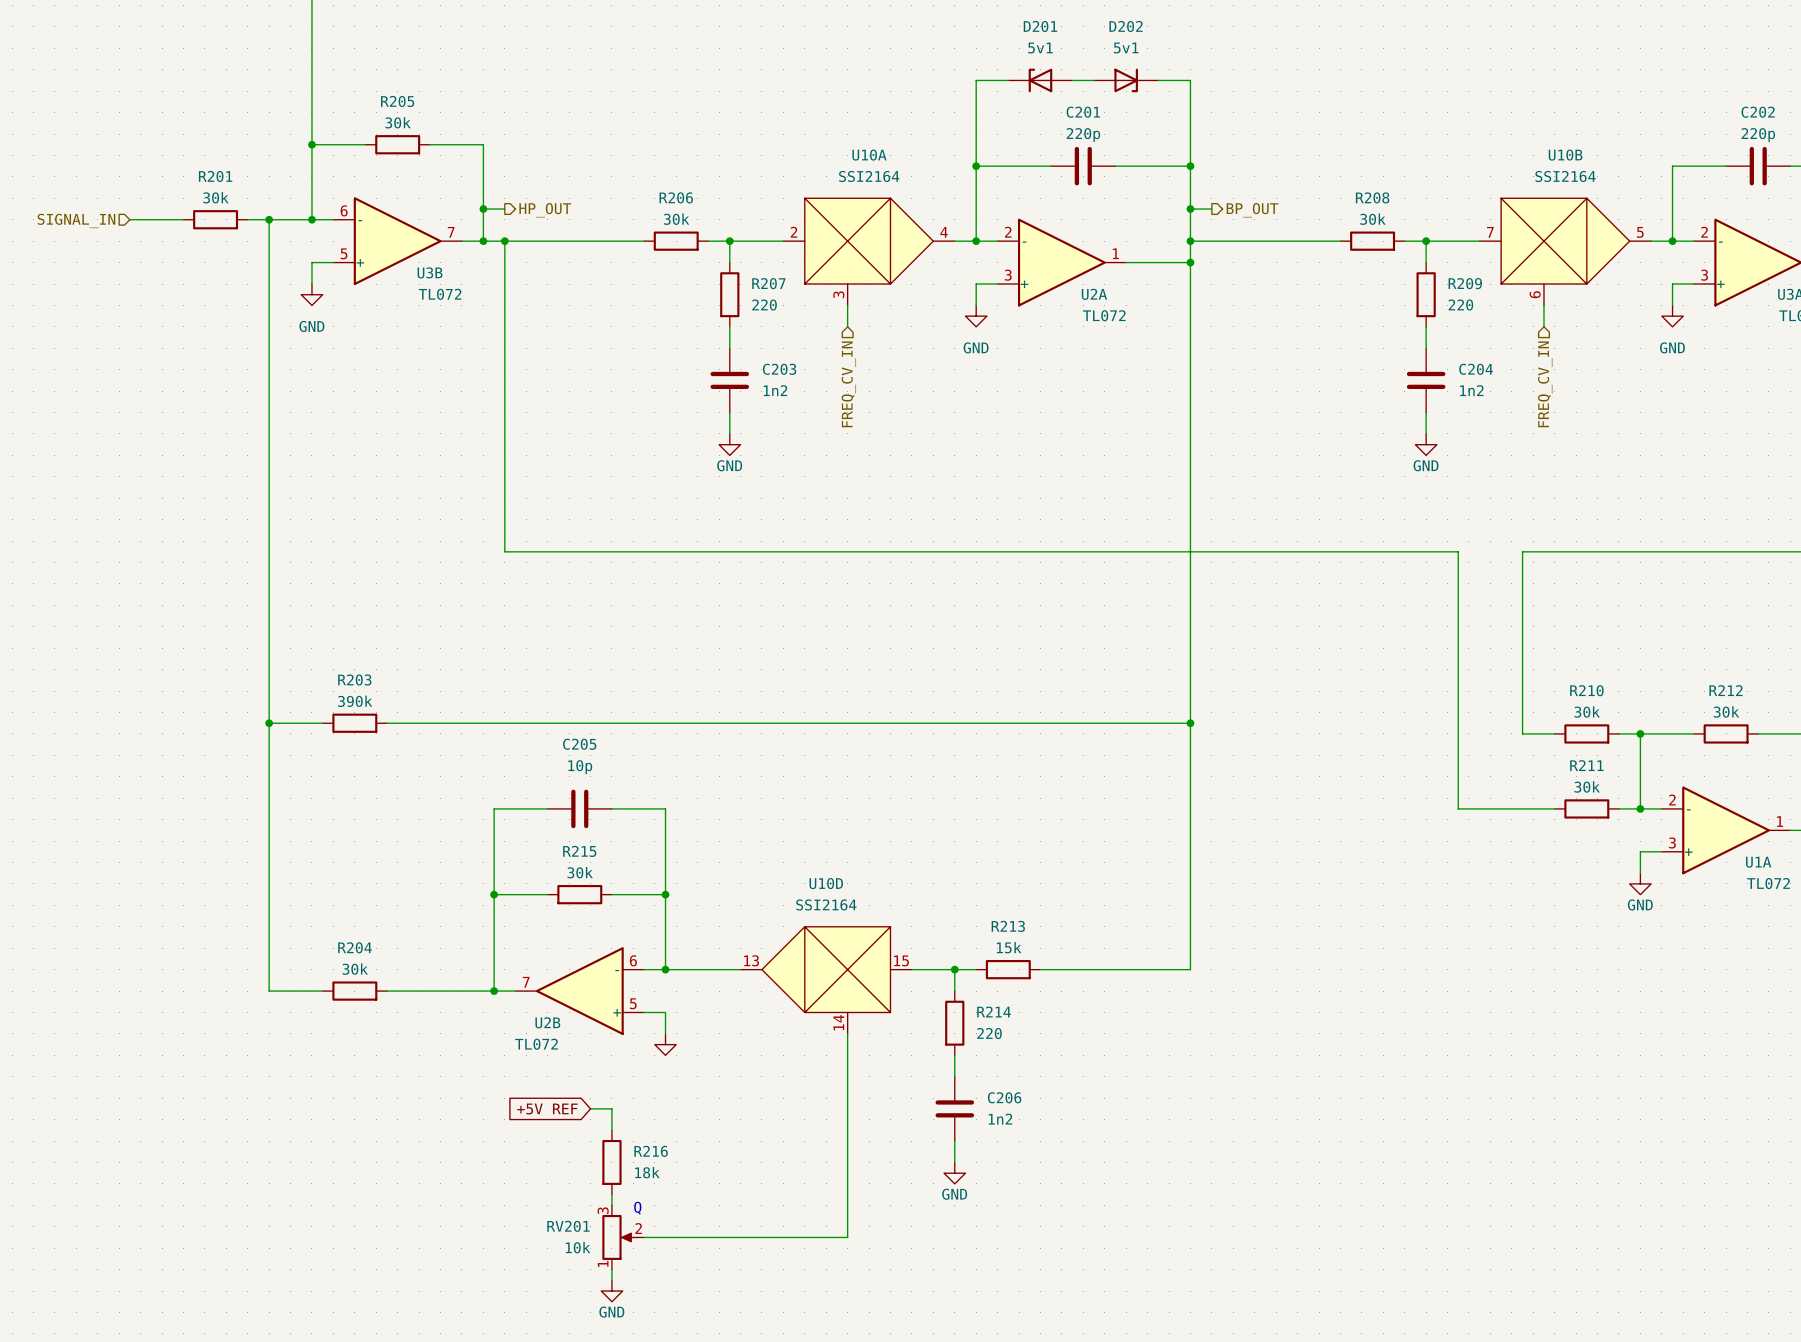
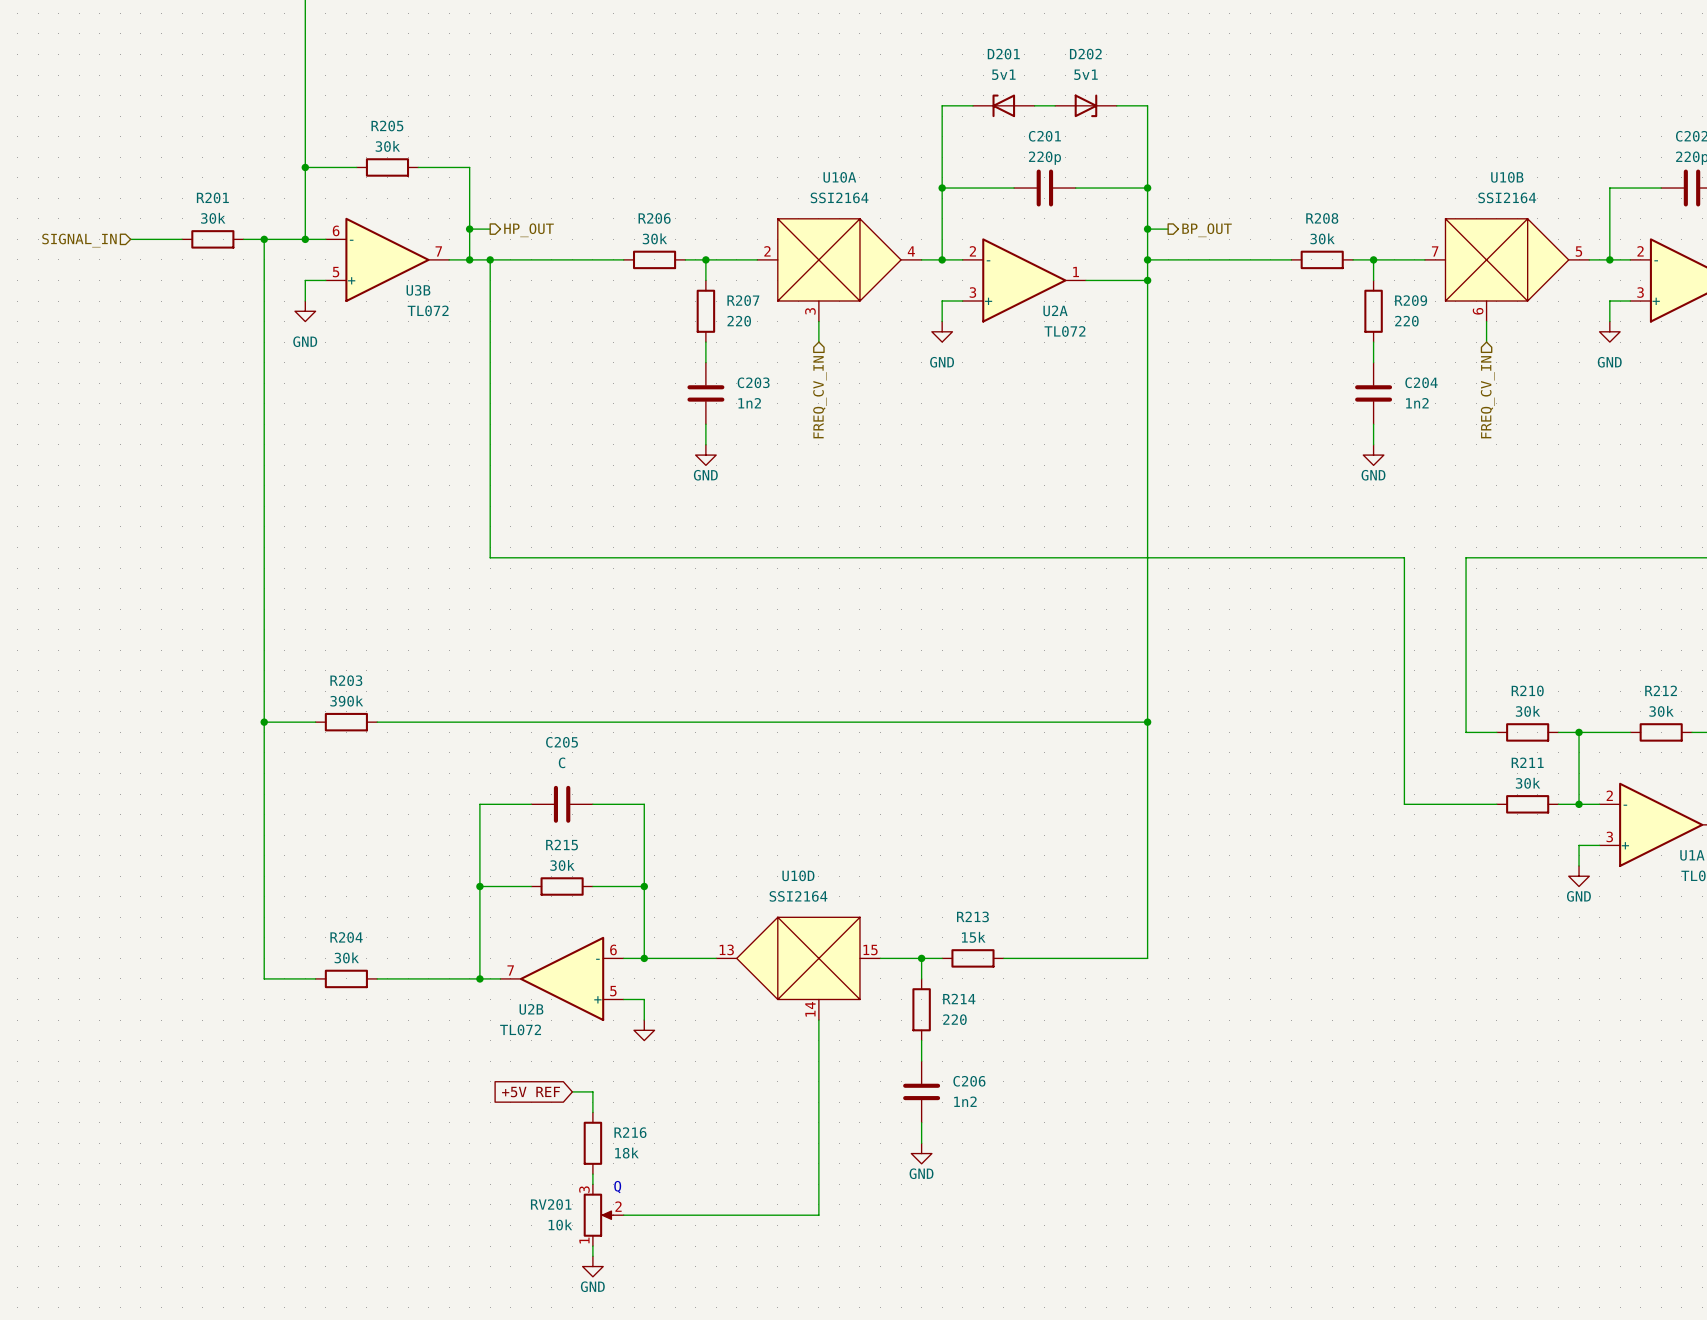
C205 value: 10p (580, 767) -> C (562, 762)

